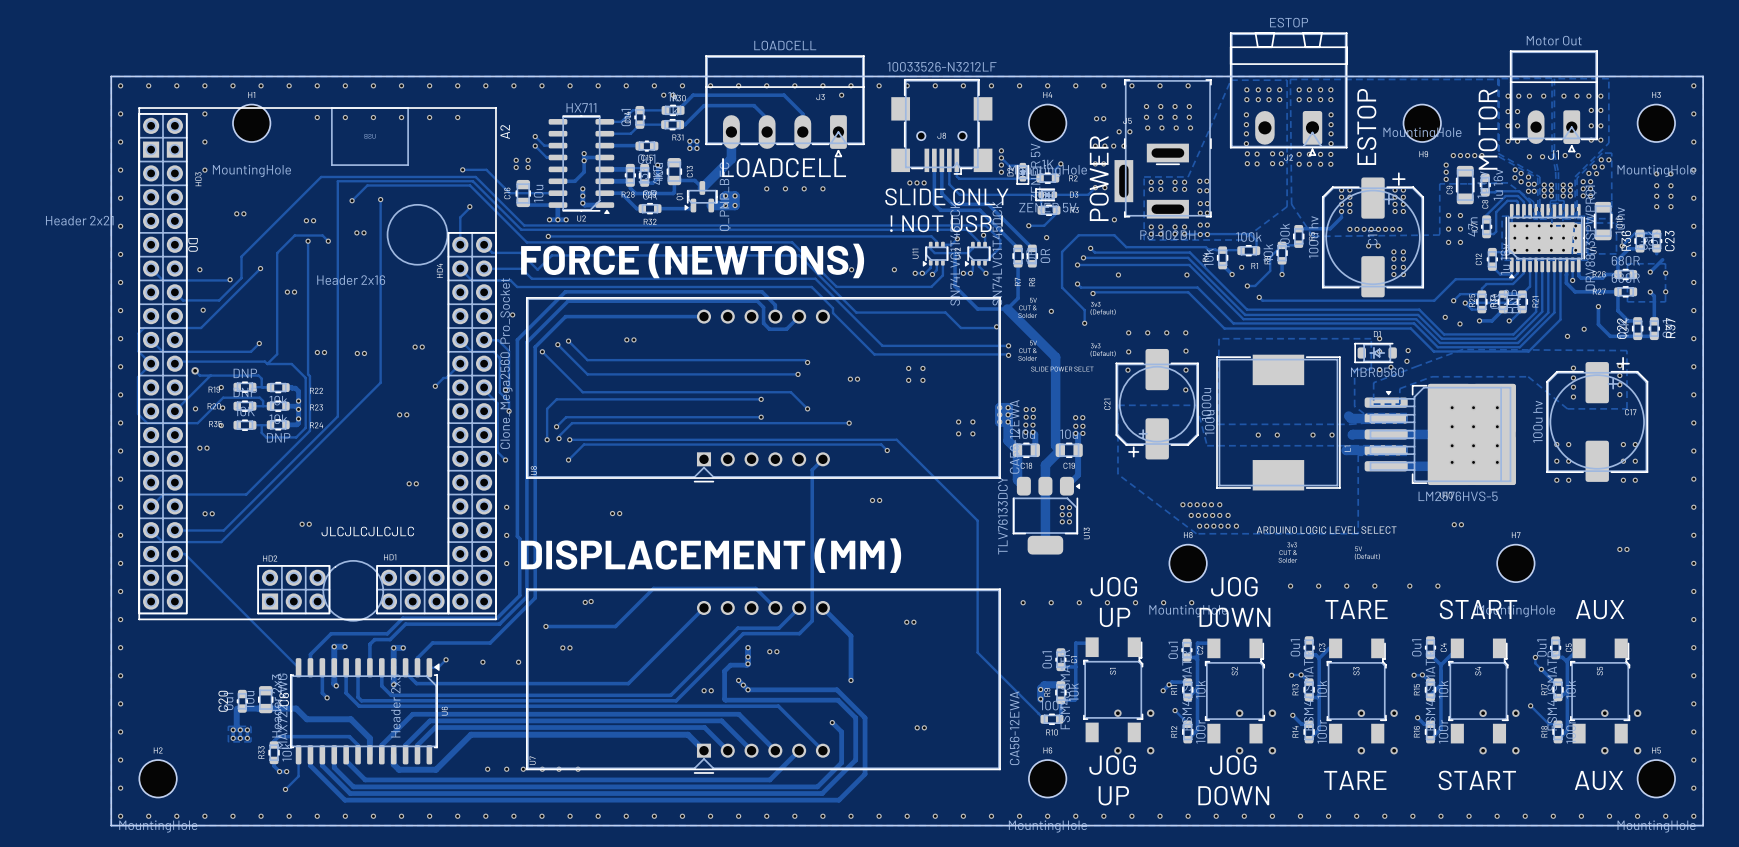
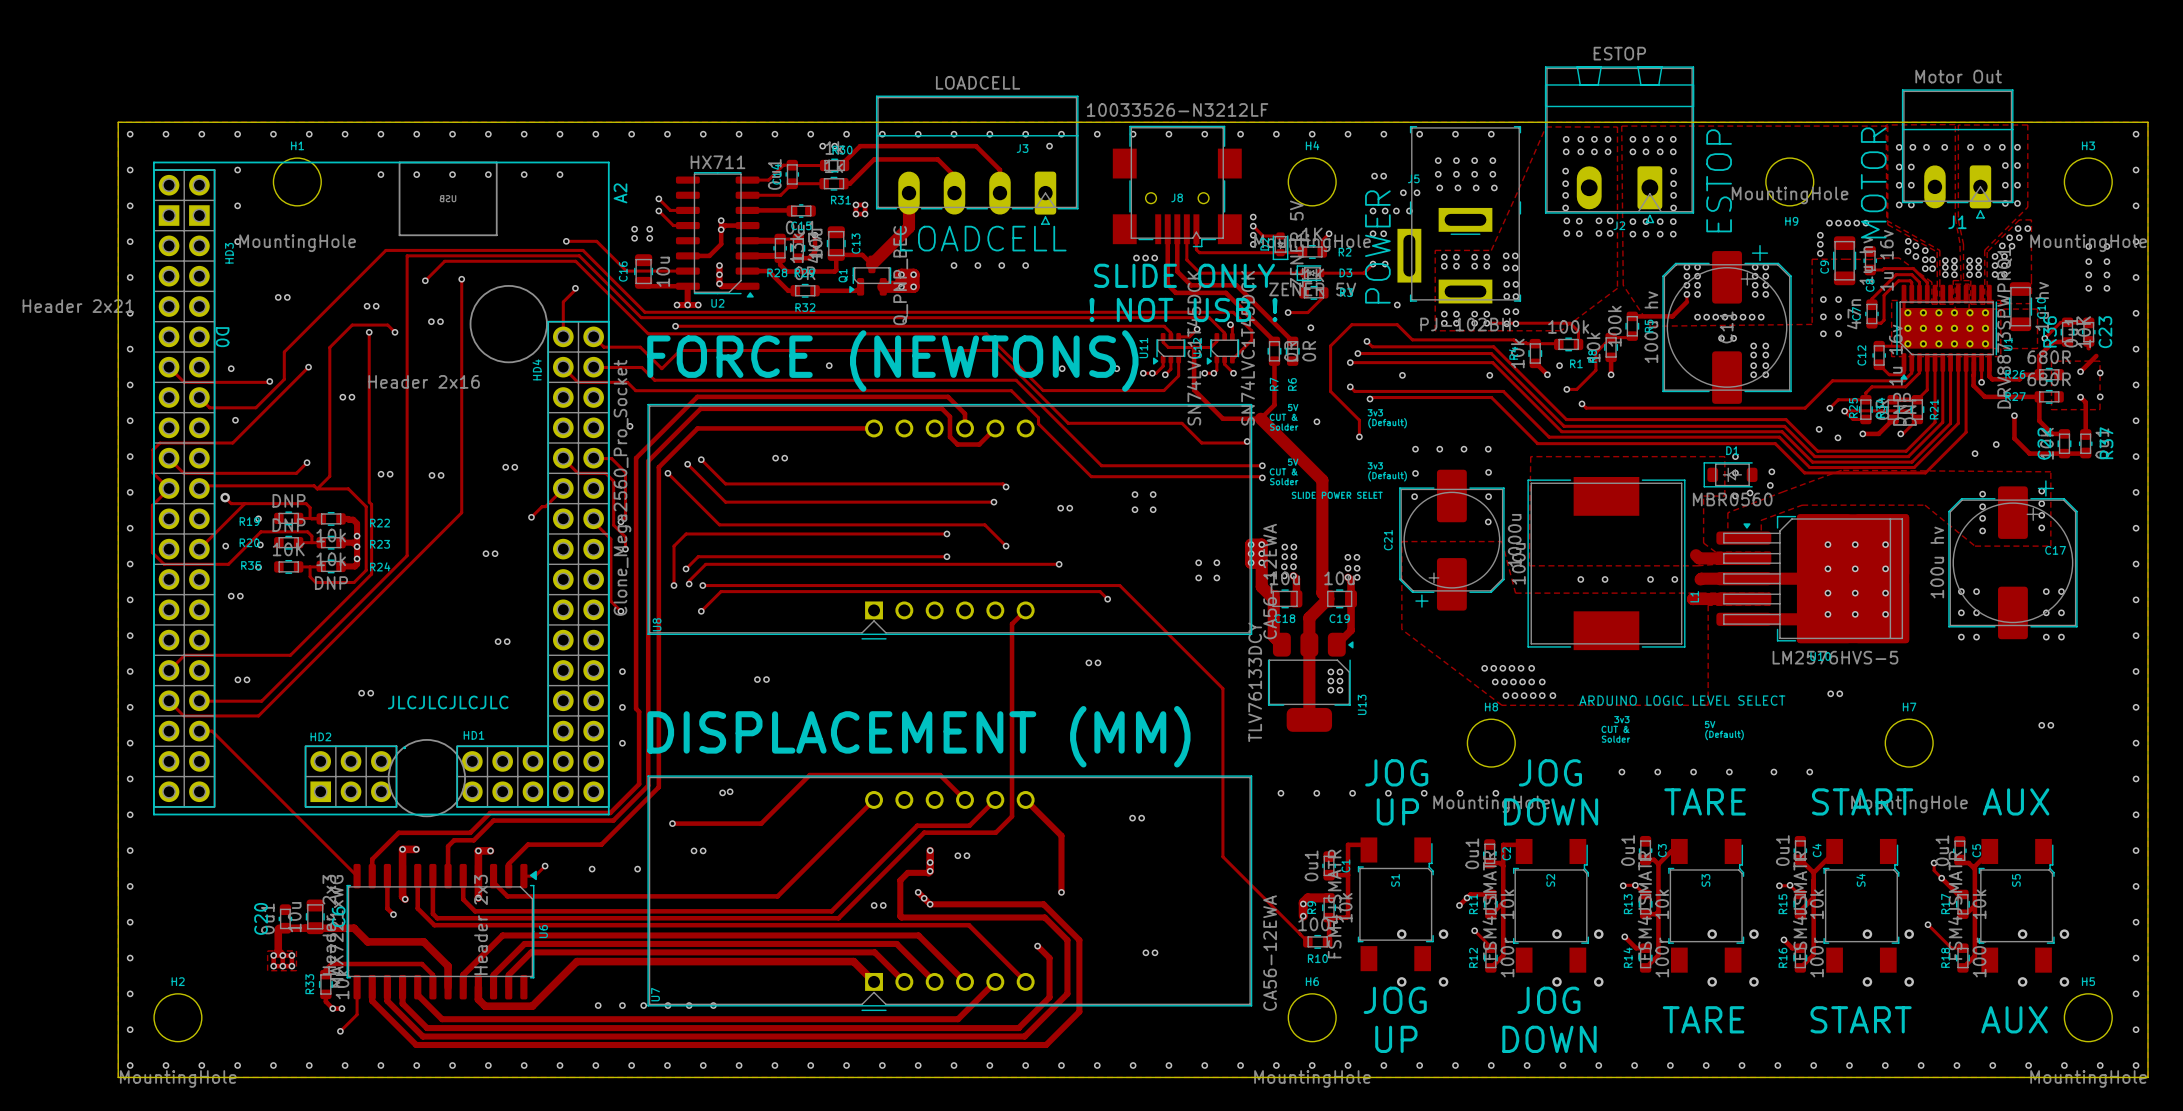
via: (1565, 155) -> none
via: (1578, 155) -> none
via: (1529, 156) -> none
via: (1542, 156) -> none

